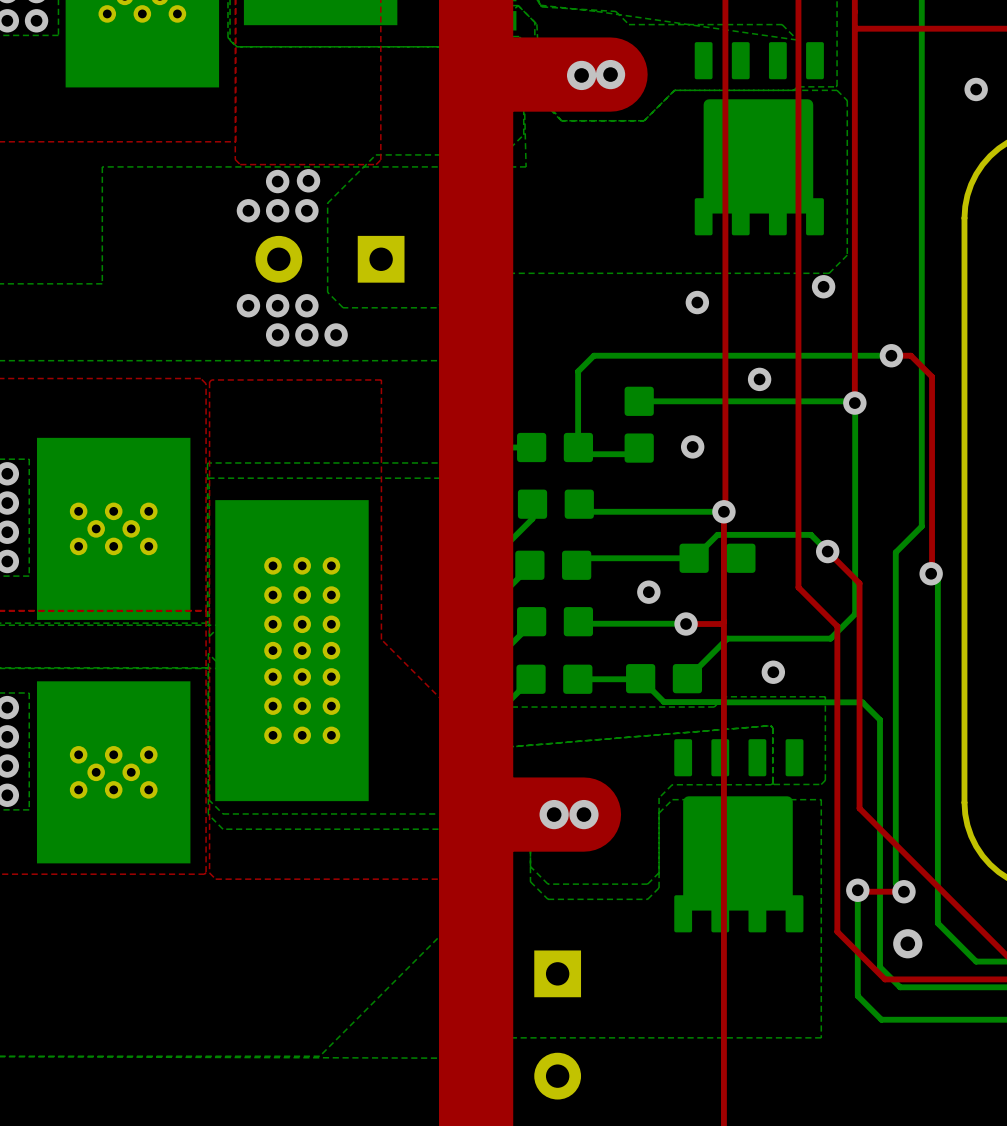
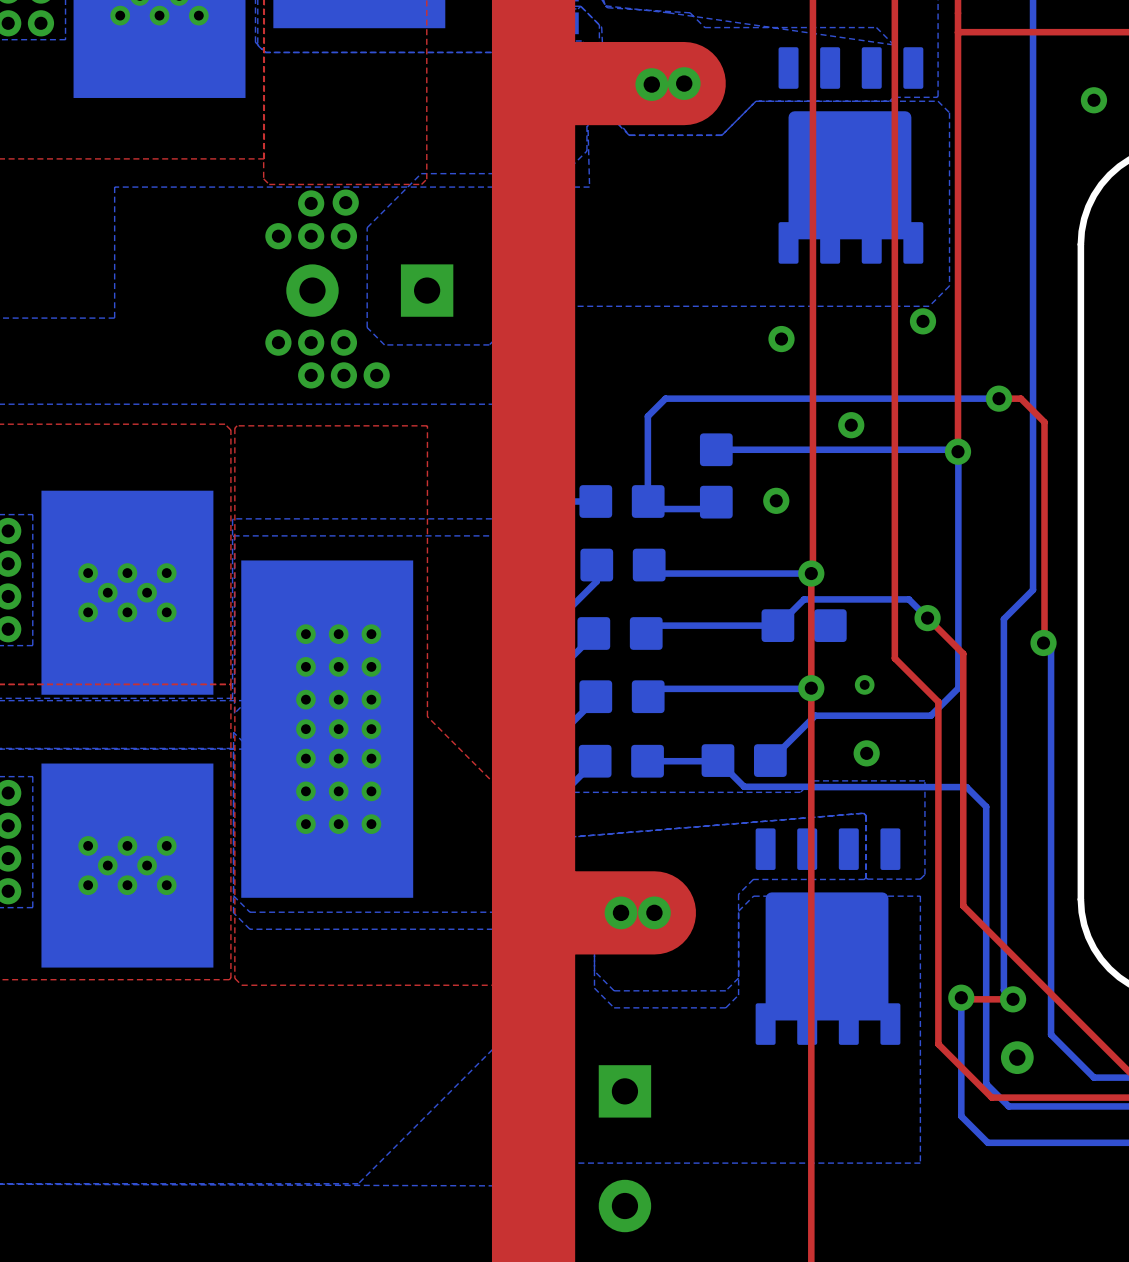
via: (648, 592) -> none
via: none -> (864, 684)
via: none -> (811, 688)
top track: (723, 621) (721, 624) (686, 624) -> none
bottom track: (578, 623) (685, 623) -> (648, 699) (658, 688) (811, 688)
via: (686, 624) -> none

